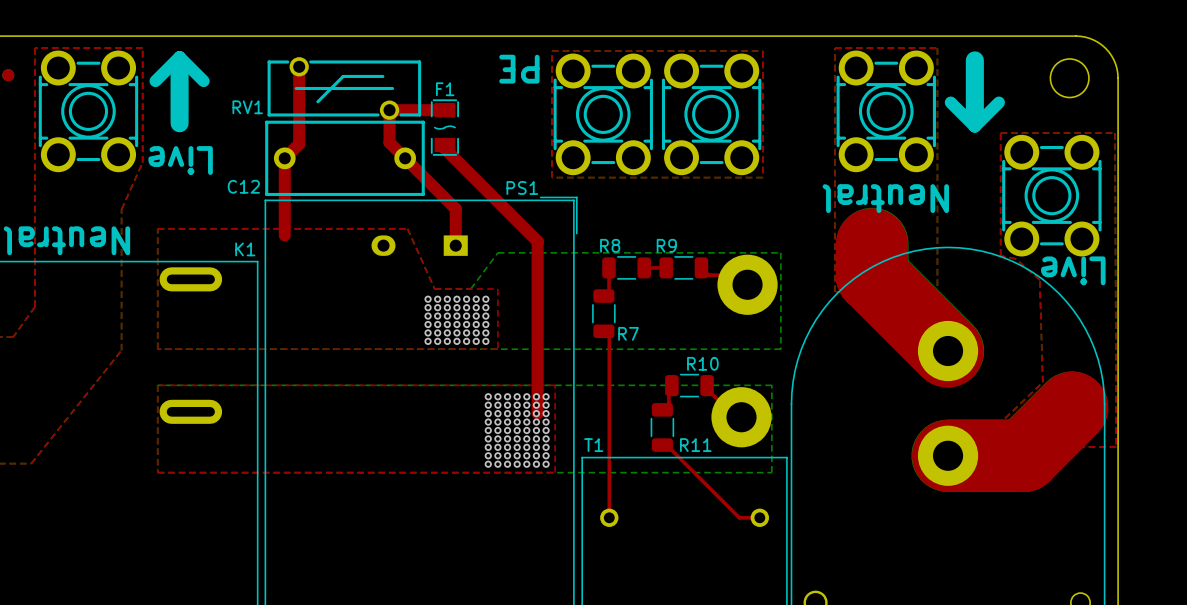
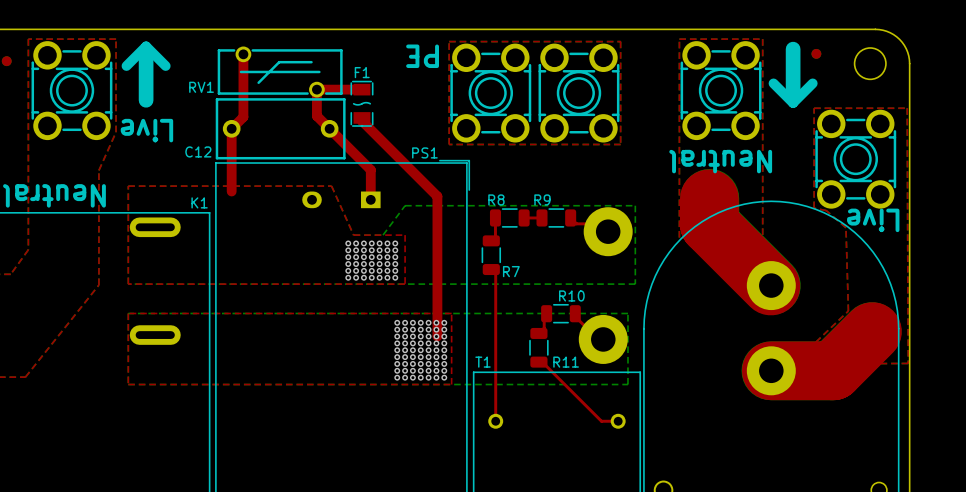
part: none -> (816, 53)

